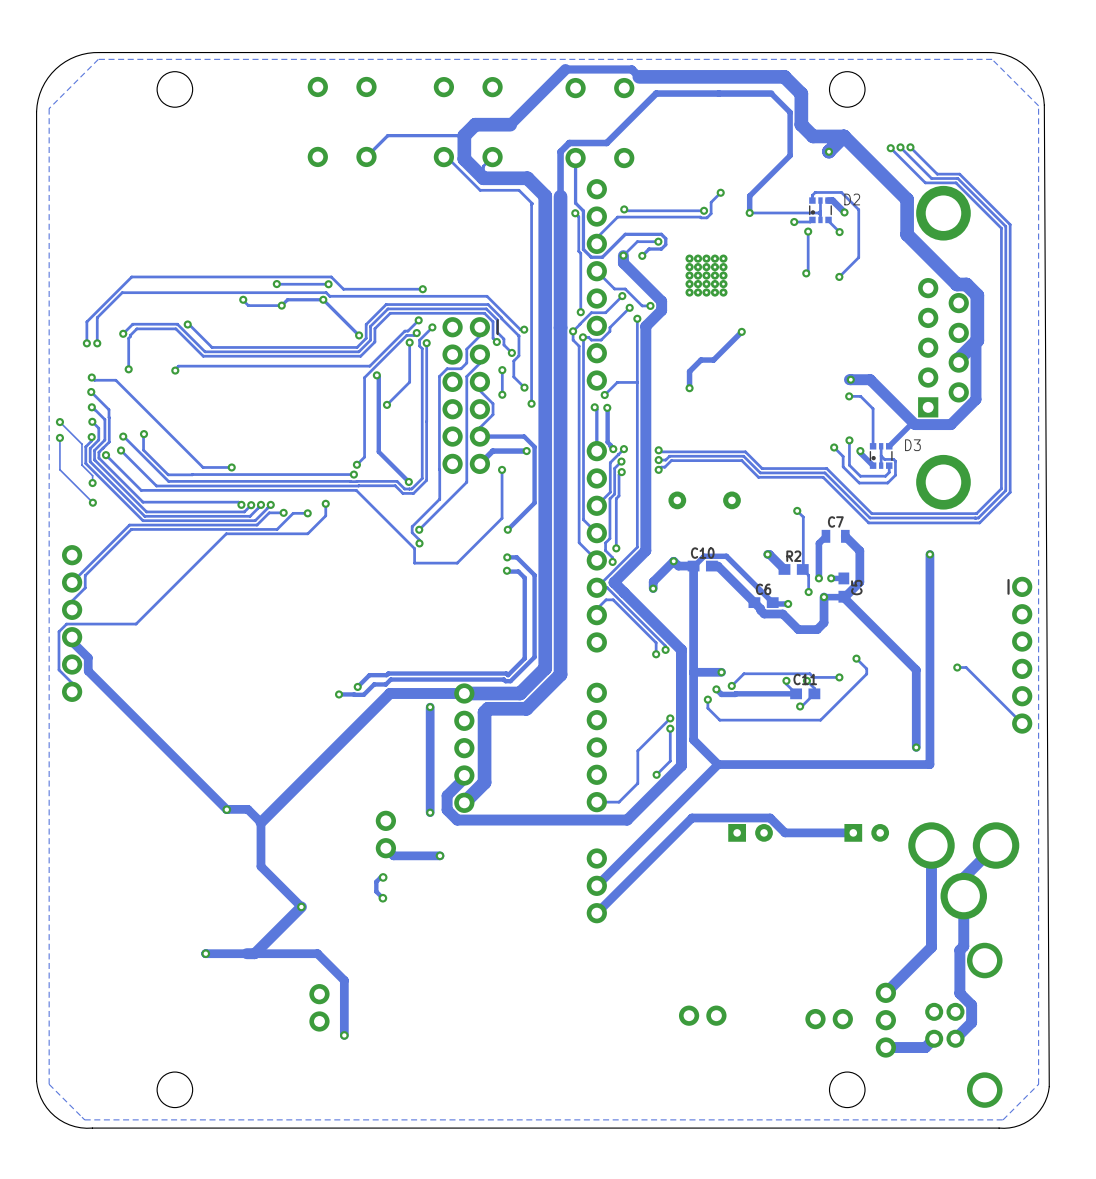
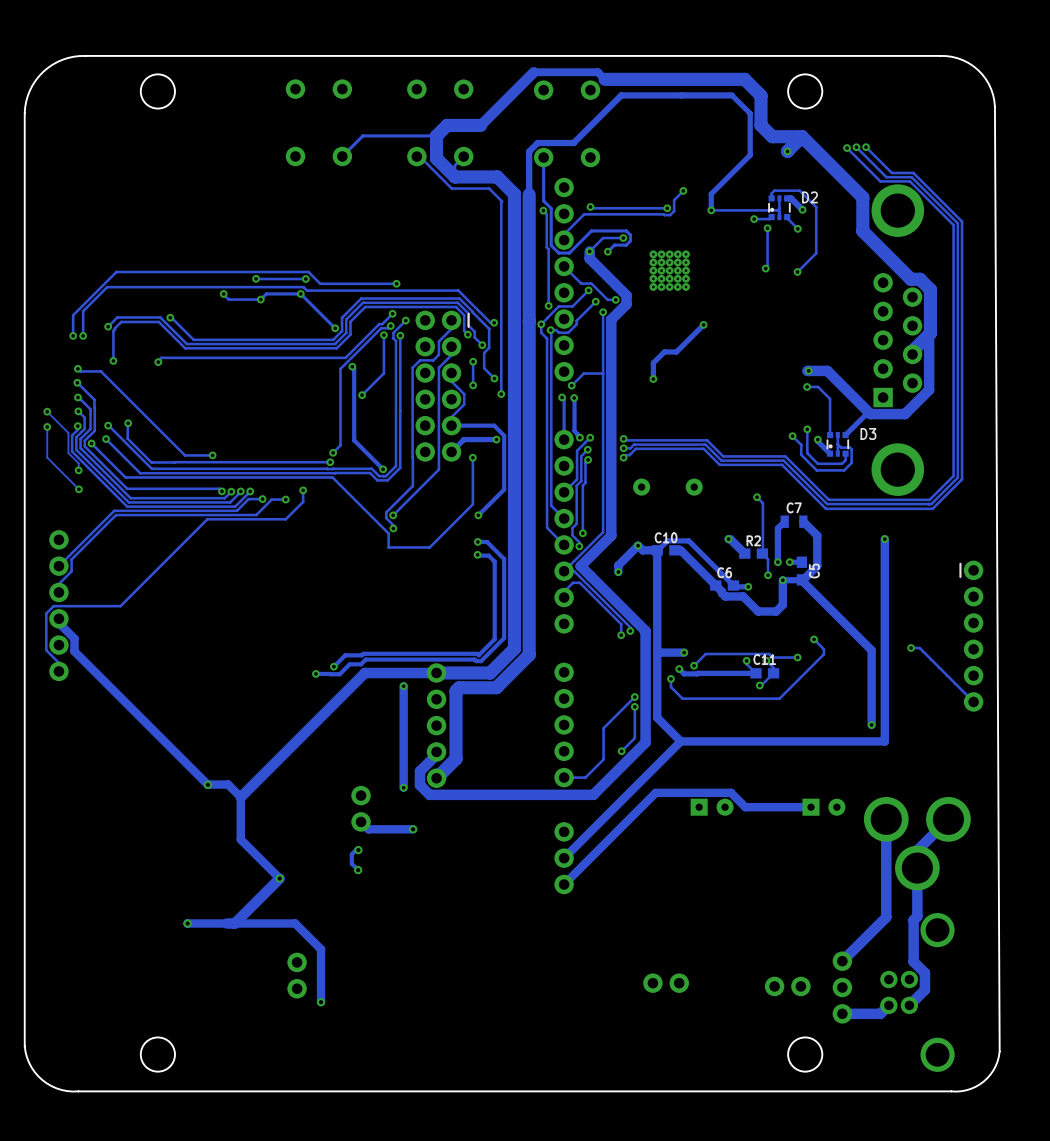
zone outline: (992, 59) (98, 59) (49, 108) (49, 1084) (84, 1119) (1003, 1119) (1038, 1084) (1038, 105) (992, 59) -> none

